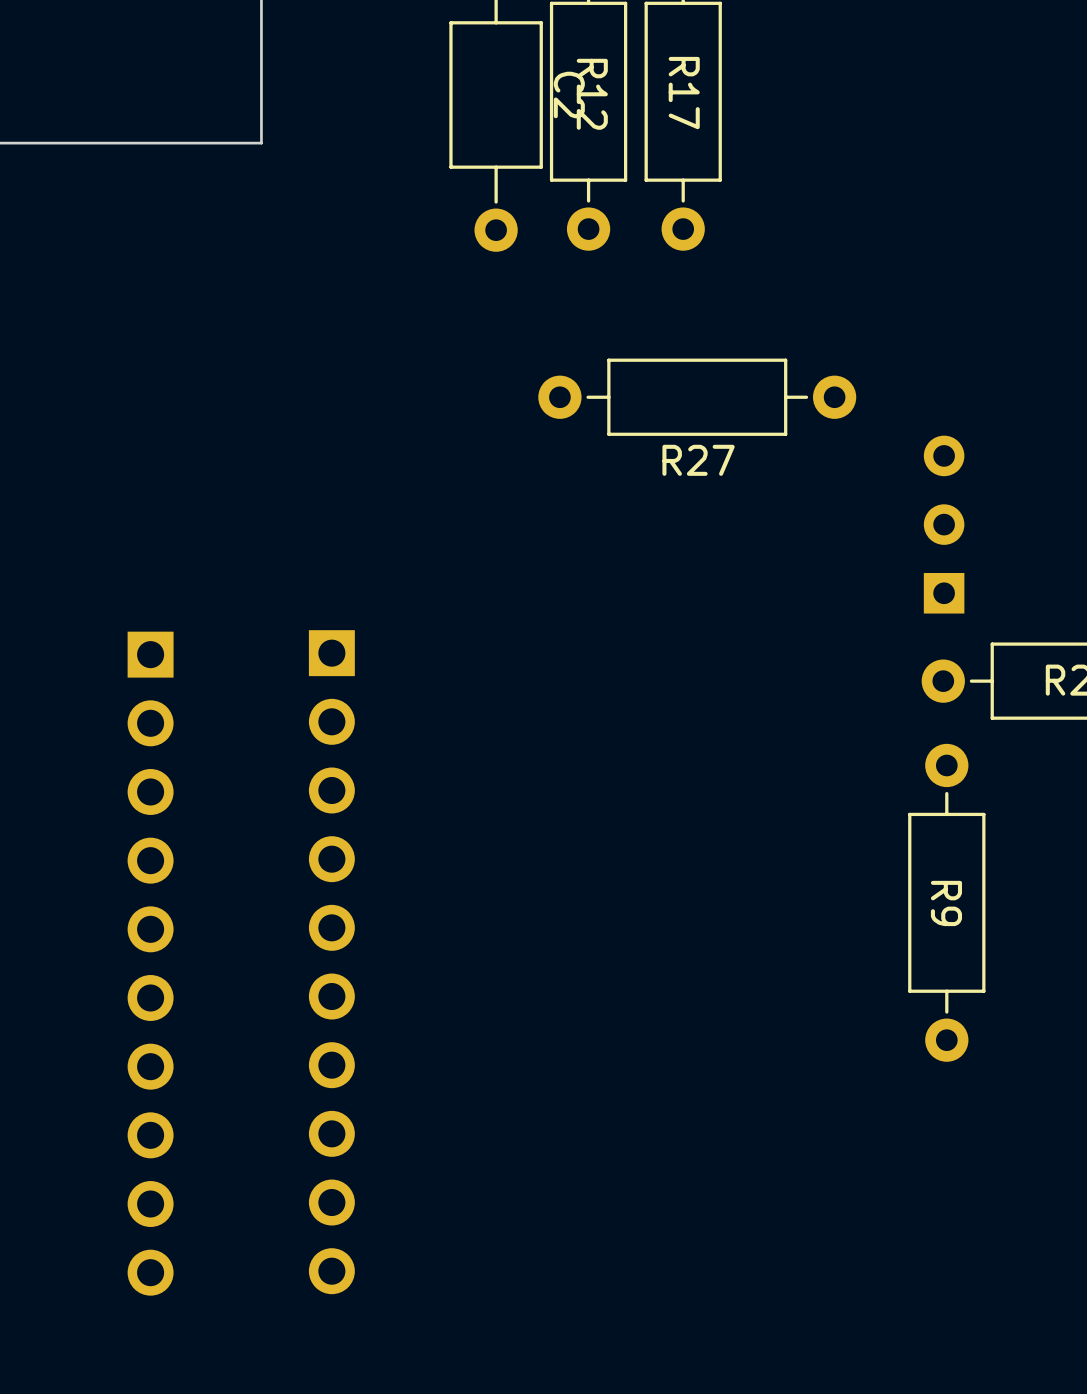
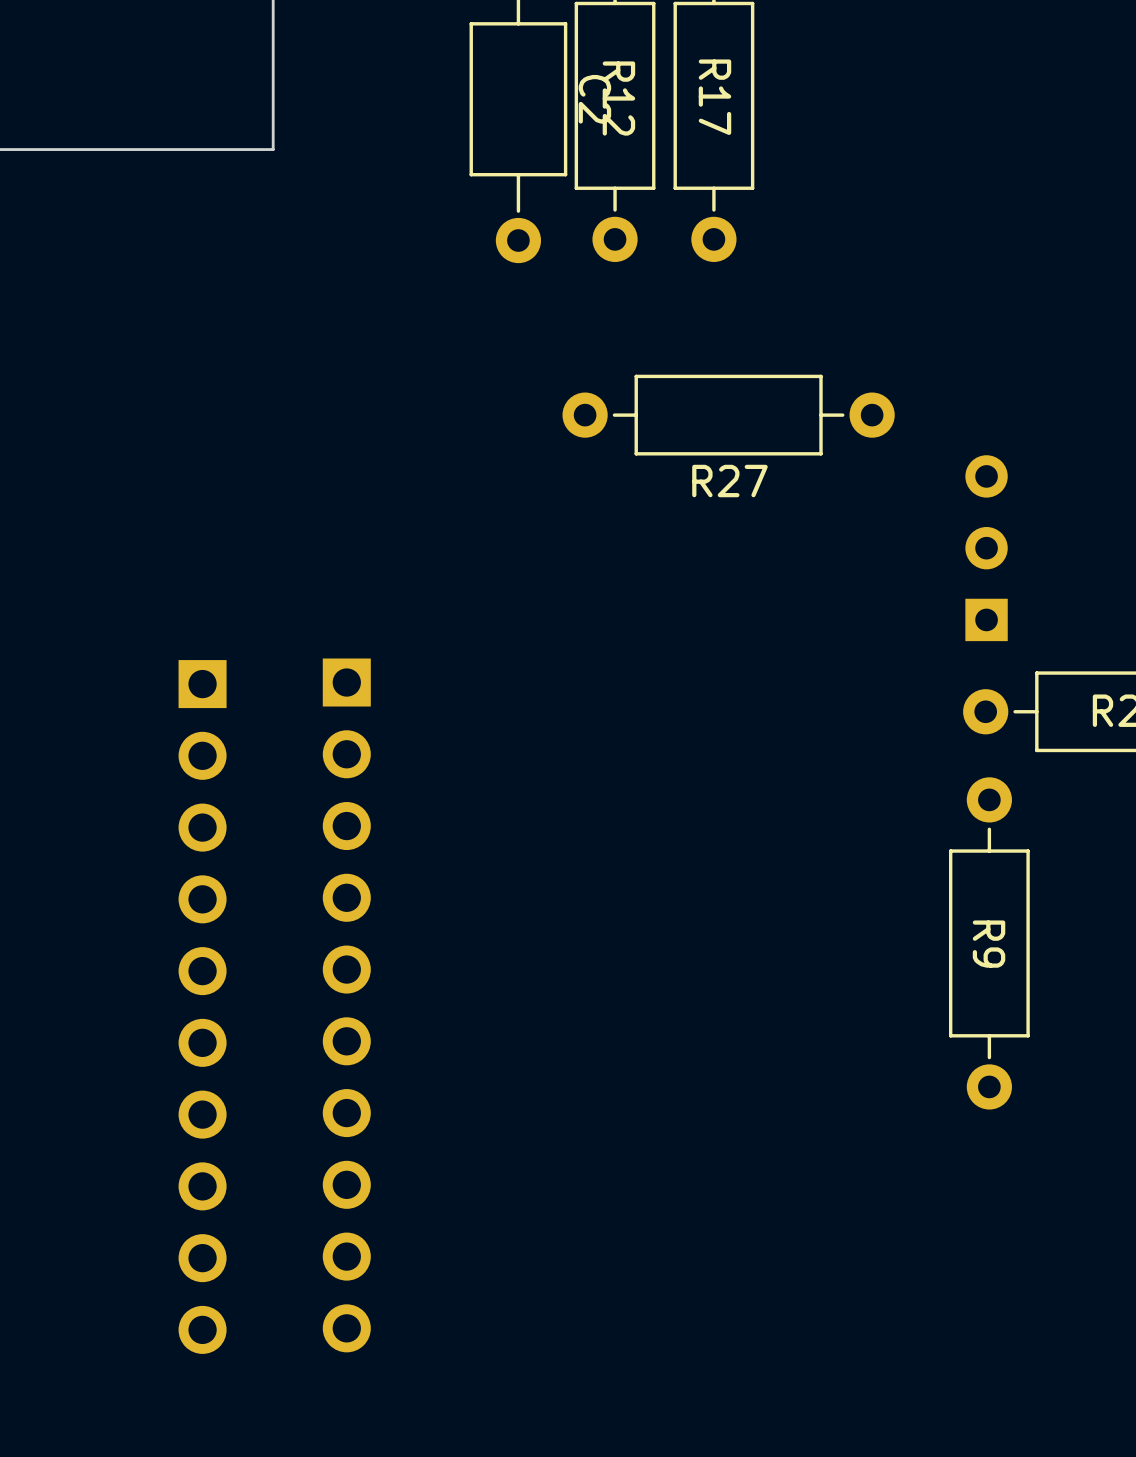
part position: (150, 963) -> (202, 1006)

